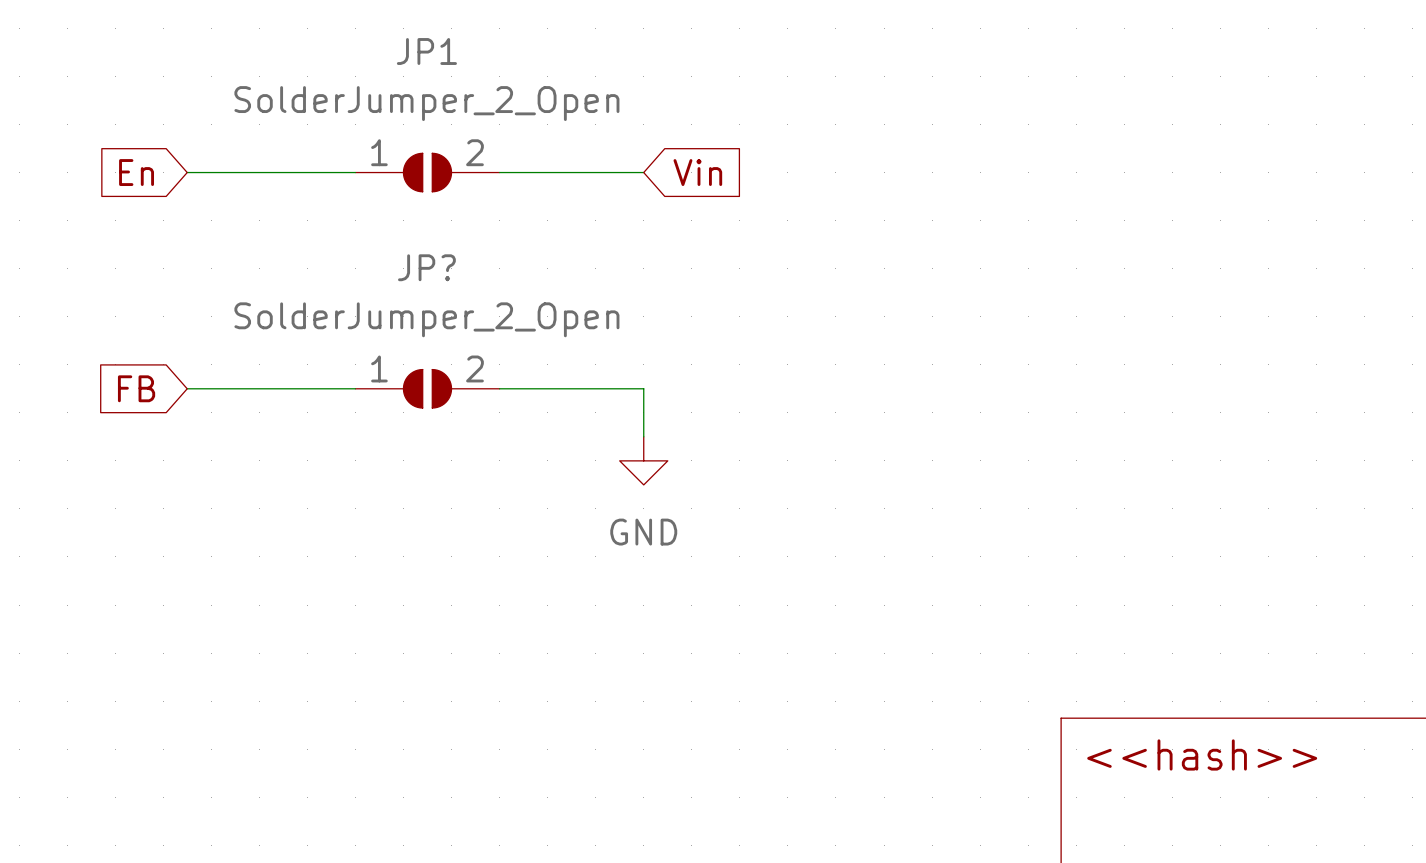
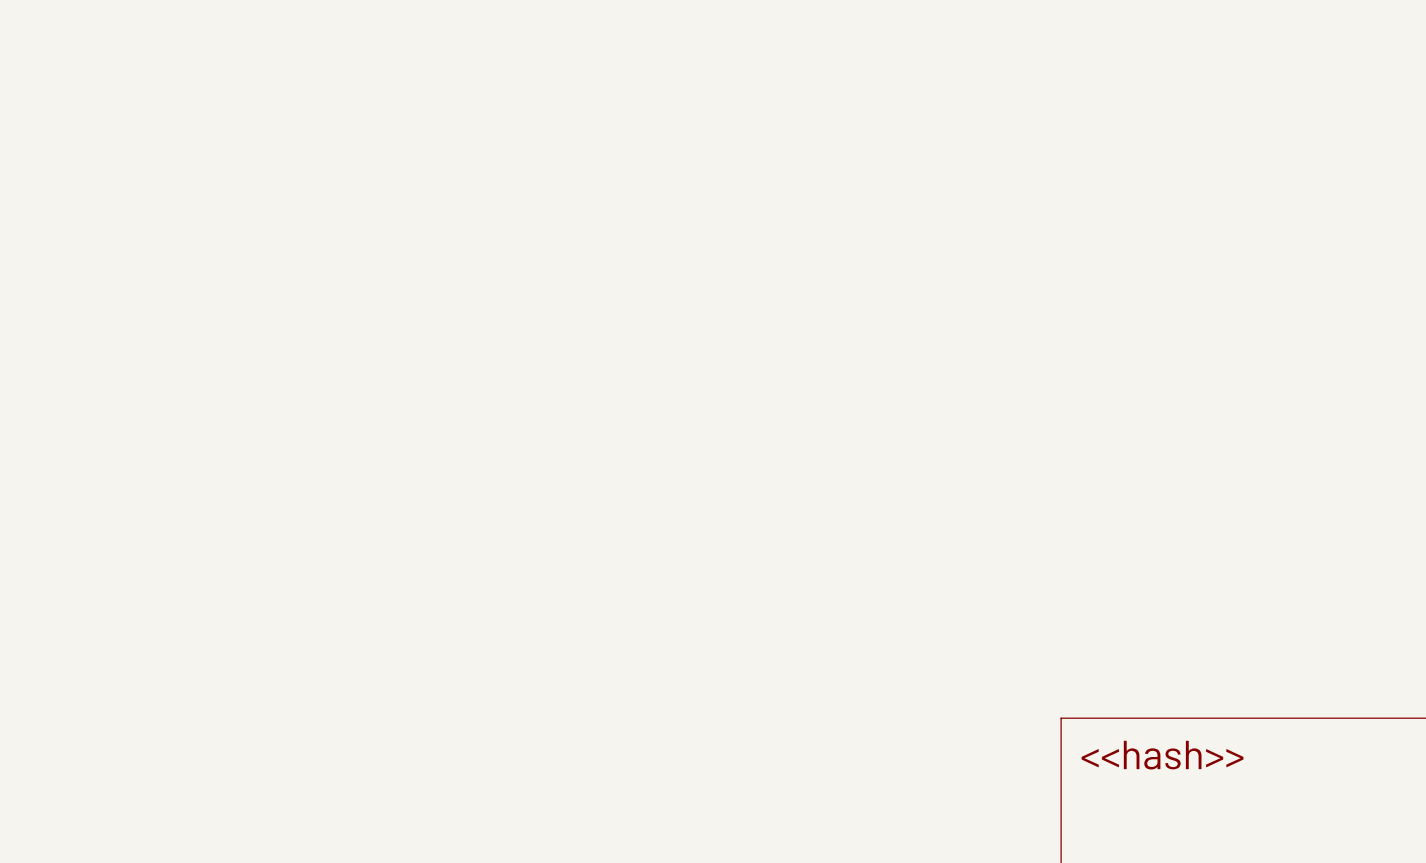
global label: En (136, 172) -> none
wire: (187, 172) (355, 172) -> none
JP1: SolderJumper_2_Open (427, 172) -> none
wire: (499, 172) (643, 172) -> none
global label: Vin (697, 172) -> none
global label: FB (136, 388) -> none
wire: (187, 388) (355, 388) -> none
JP?: SolderJumper_2_Open (427, 388) -> none
wire: (499, 388) (643, 388) (643, 436) -> none
power symbol: GND (643, 460) -> none

